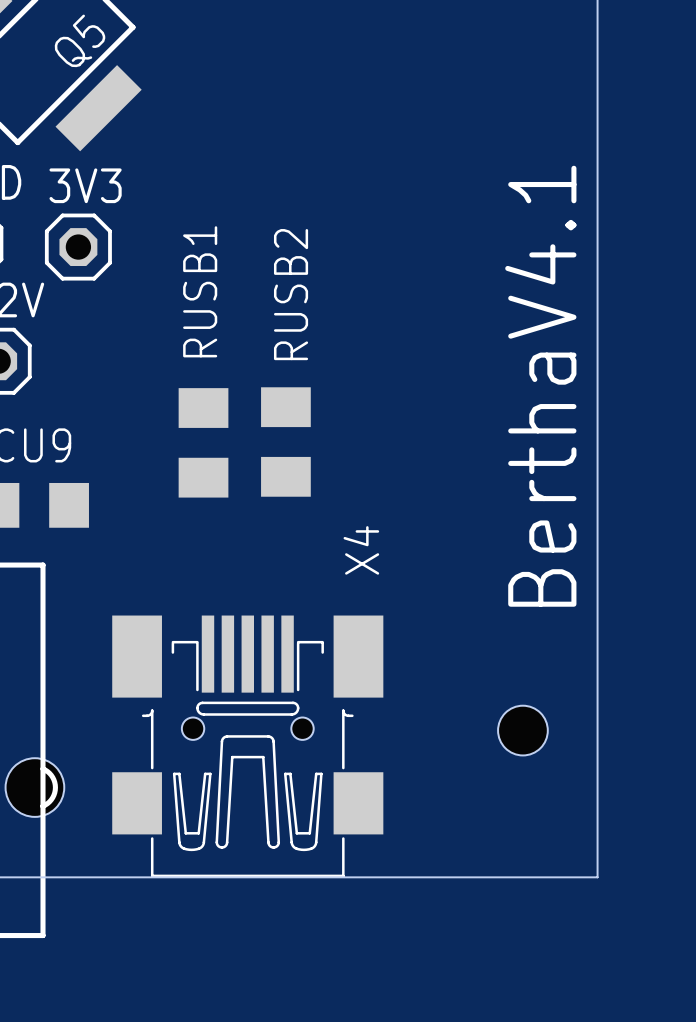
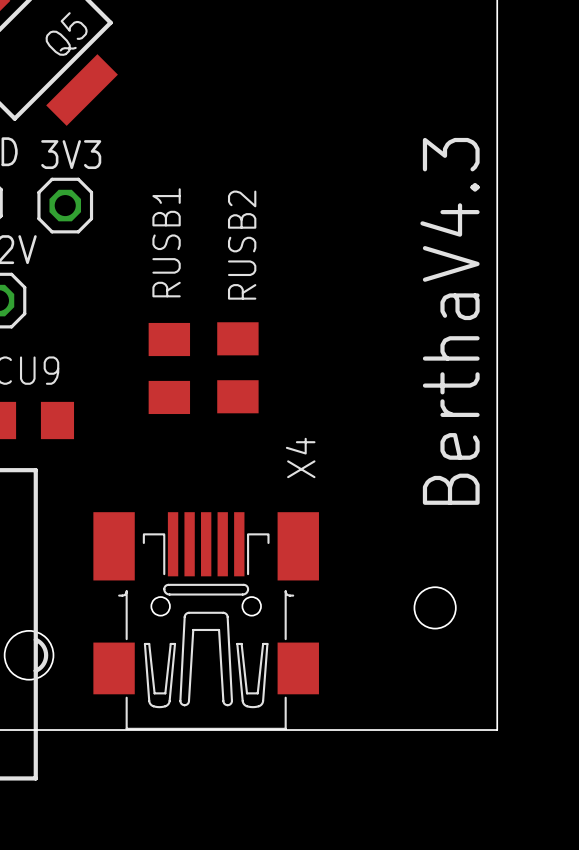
text: BerthaV4.1 (540, 386) -> BerthaV4.3 (450, 321)

